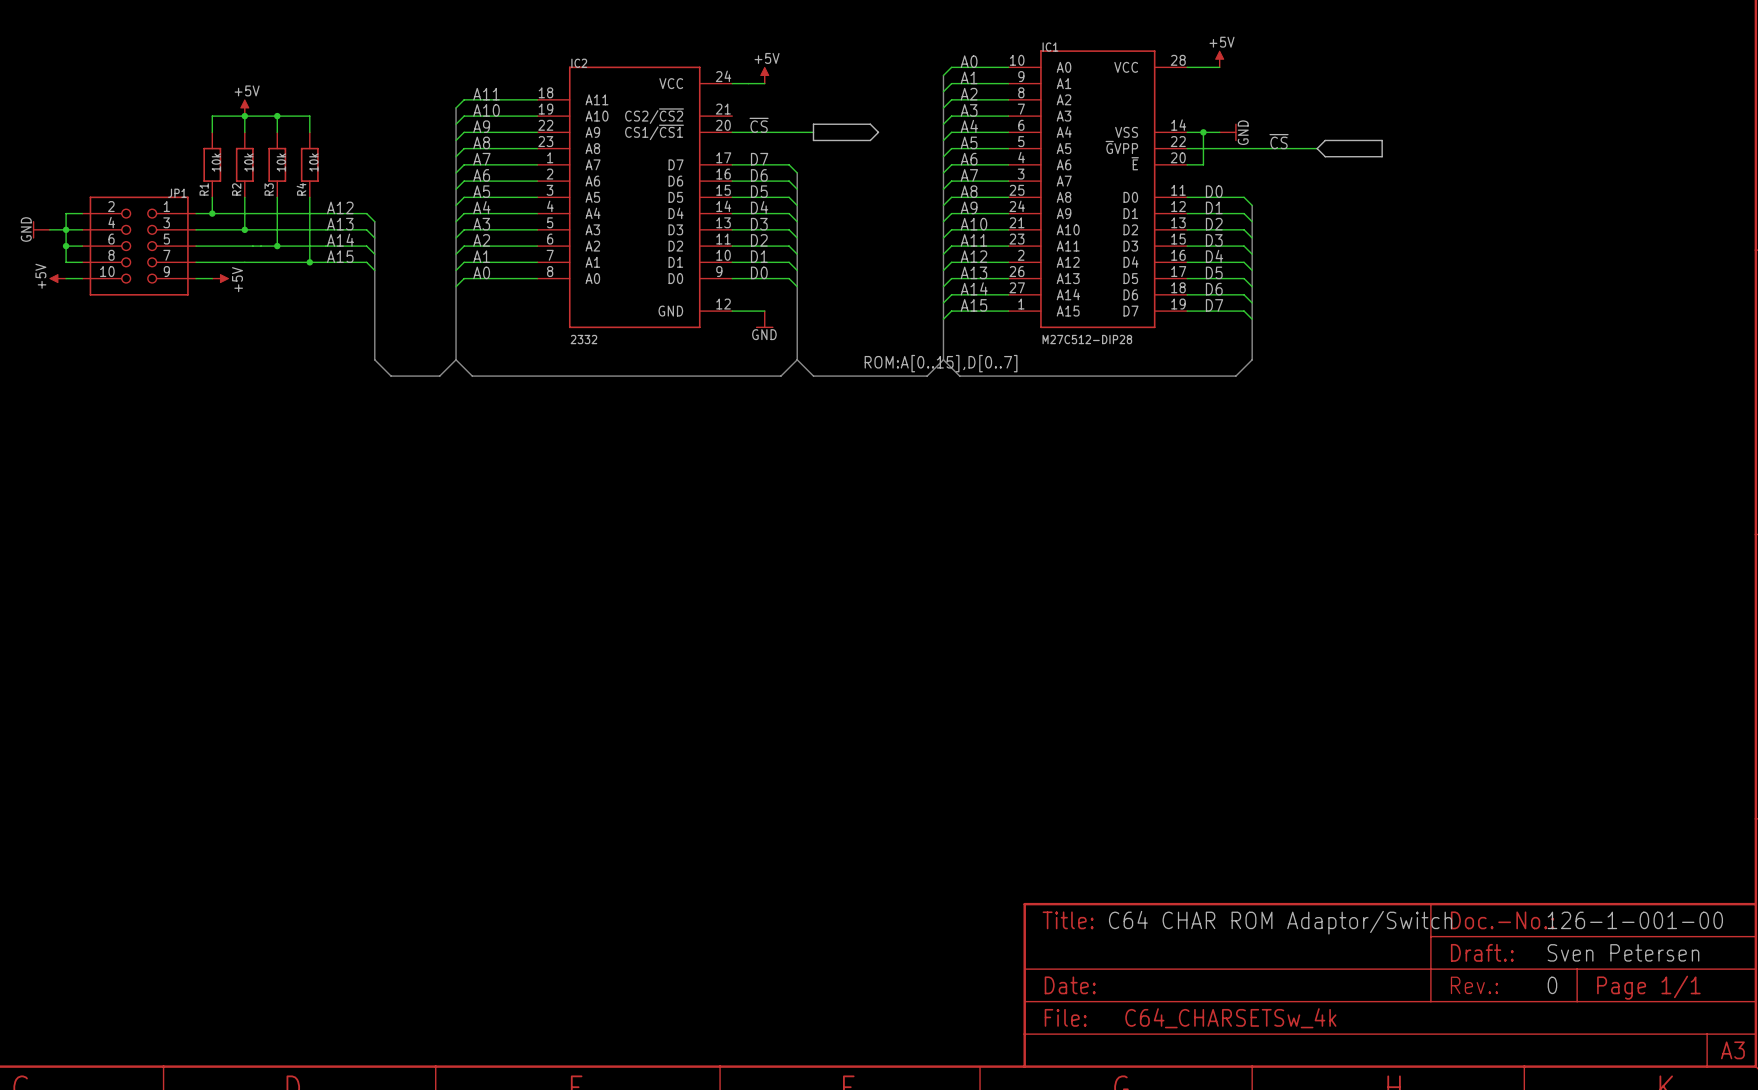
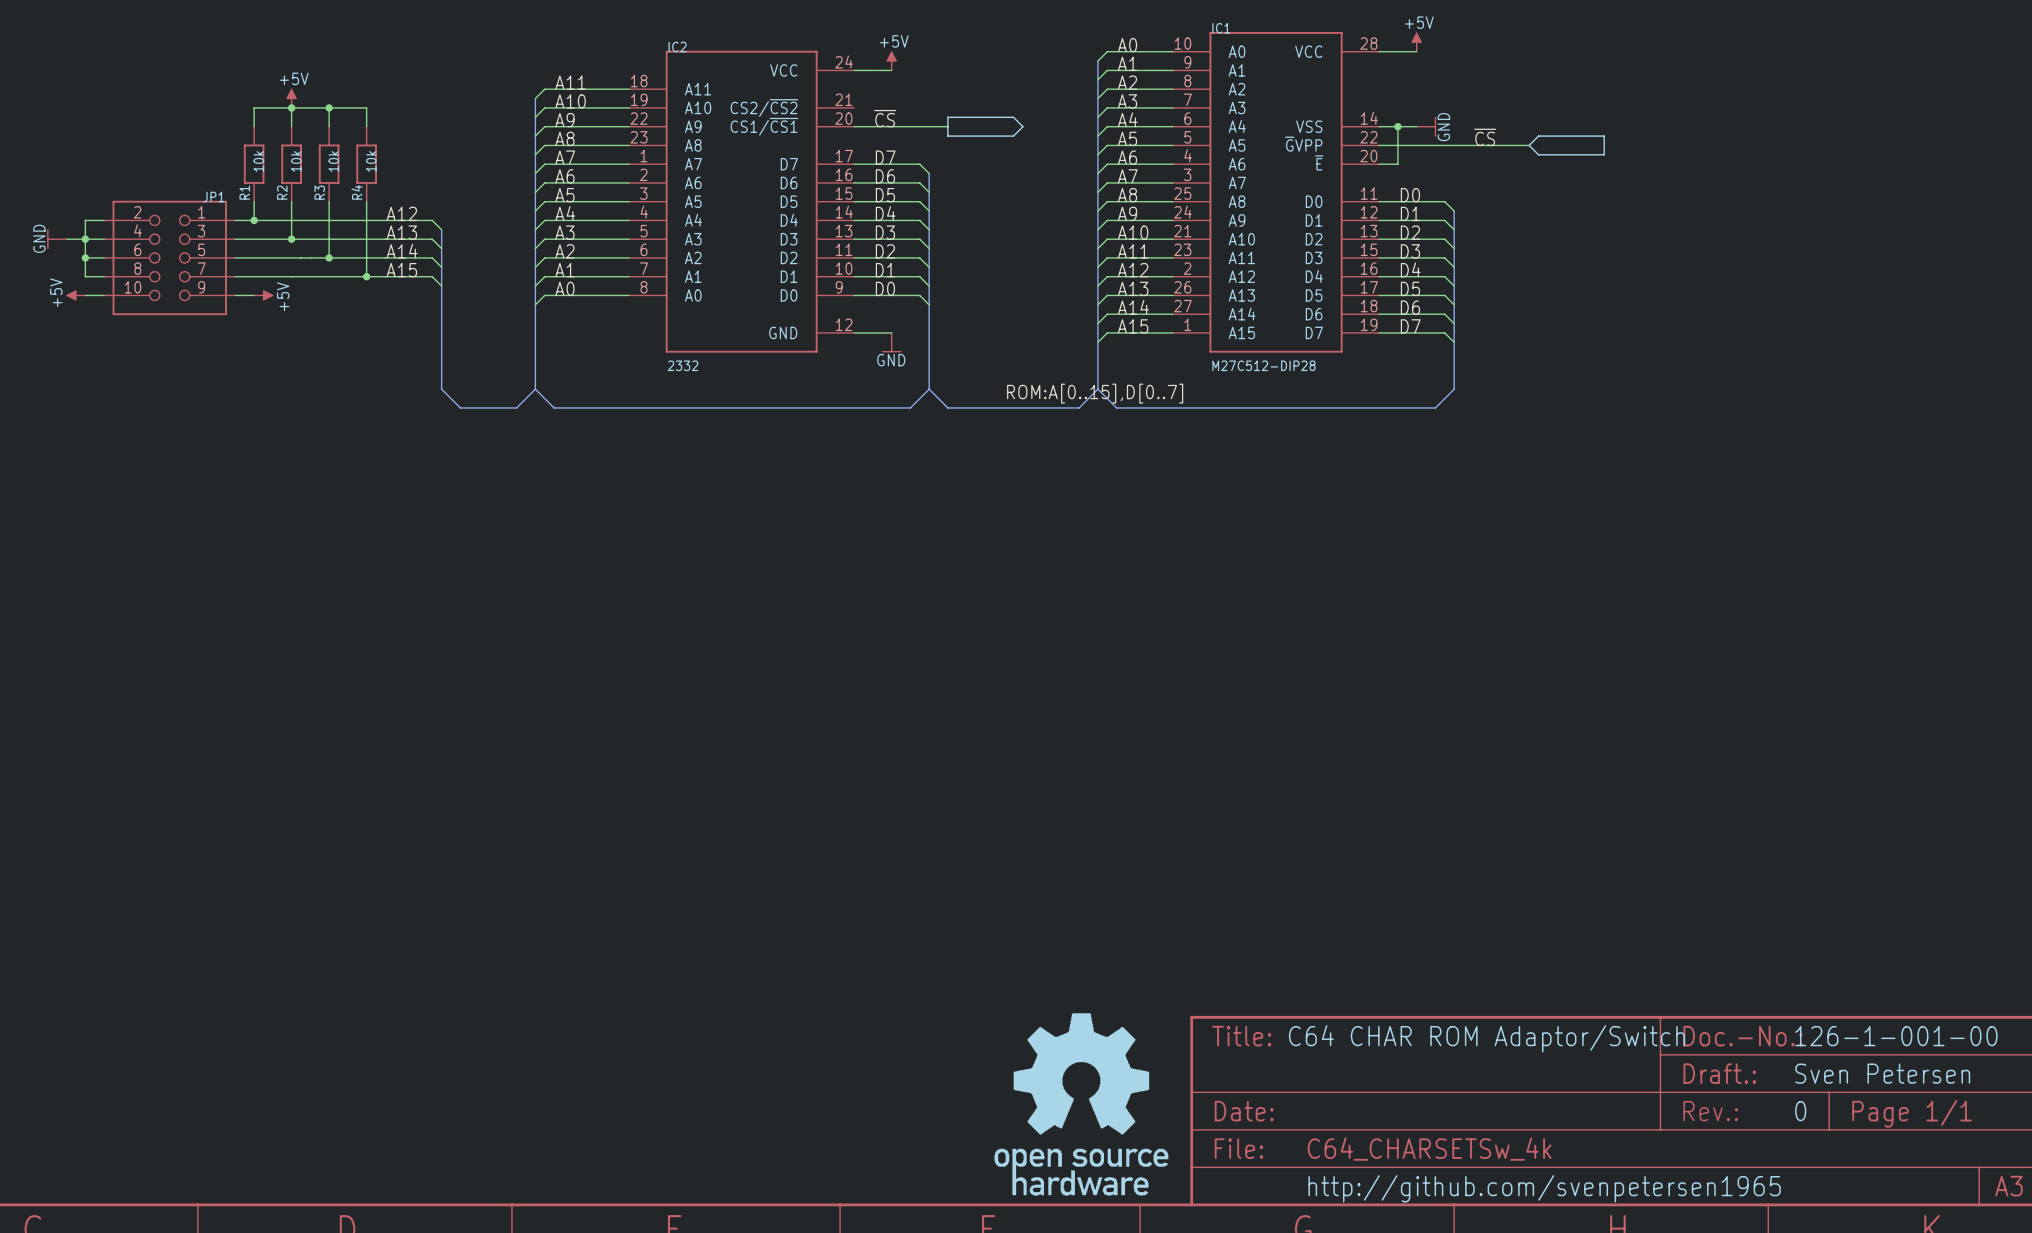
part: none -> (1081, 1104)
text: none -> http://github.com/svenpetersen1965 (1544, 1188)

